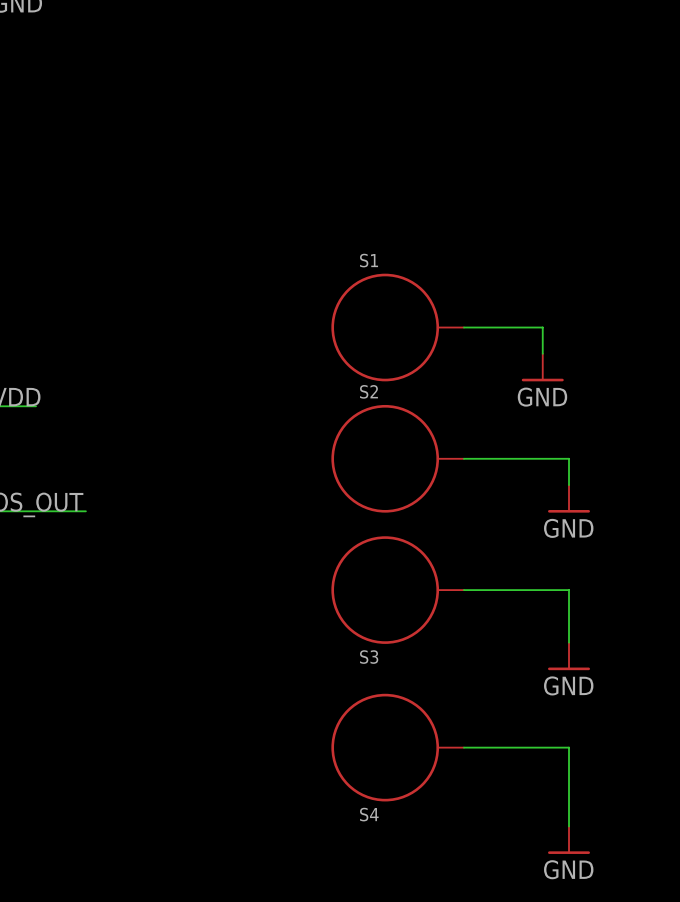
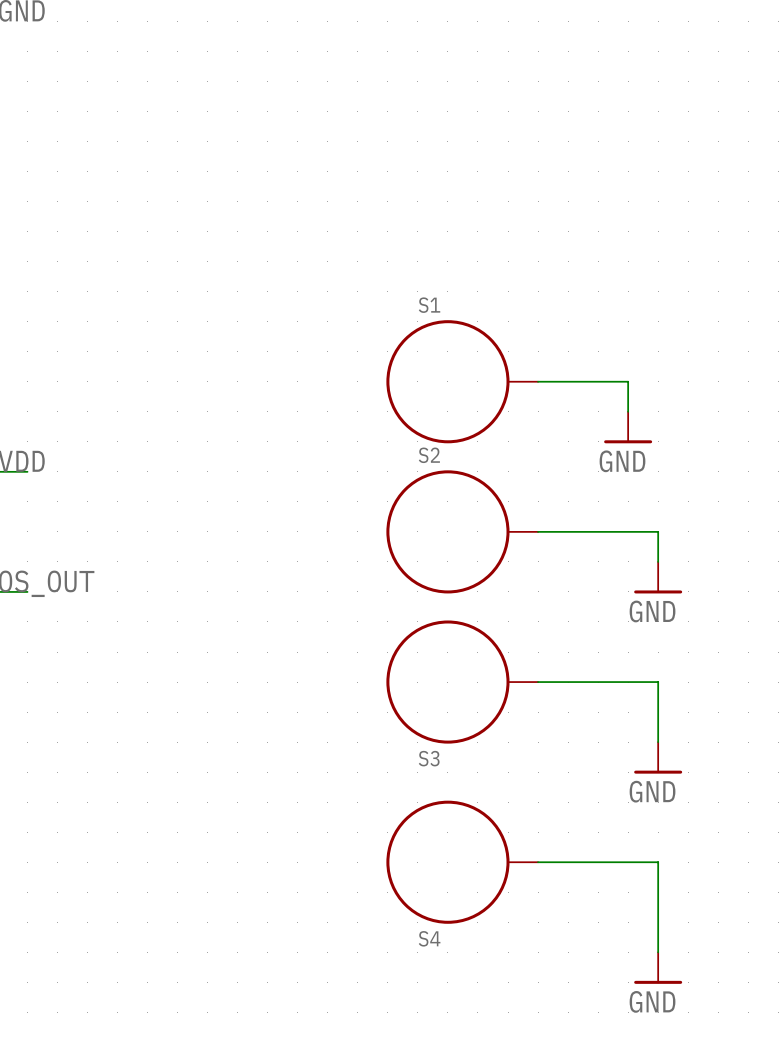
wire: (17, 406) (35, 406) -> none
wire: (17, 511) (85, 511) -> none

